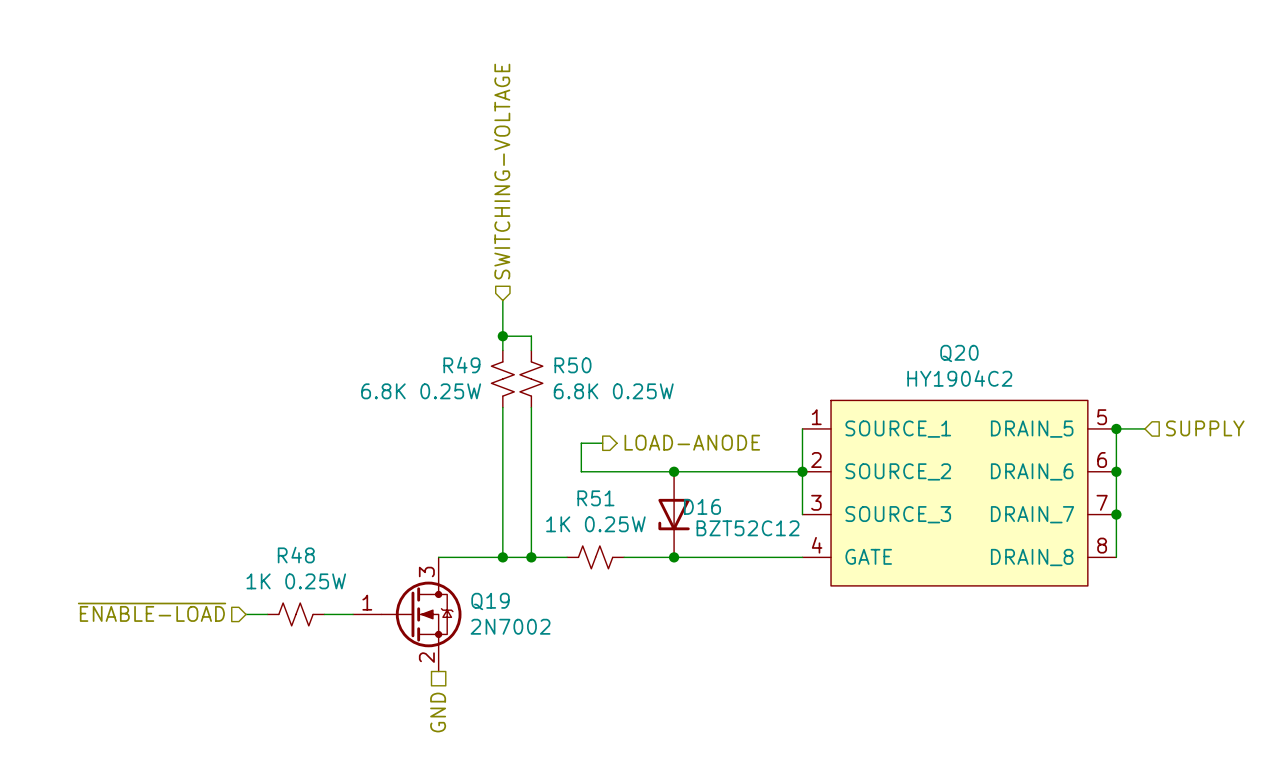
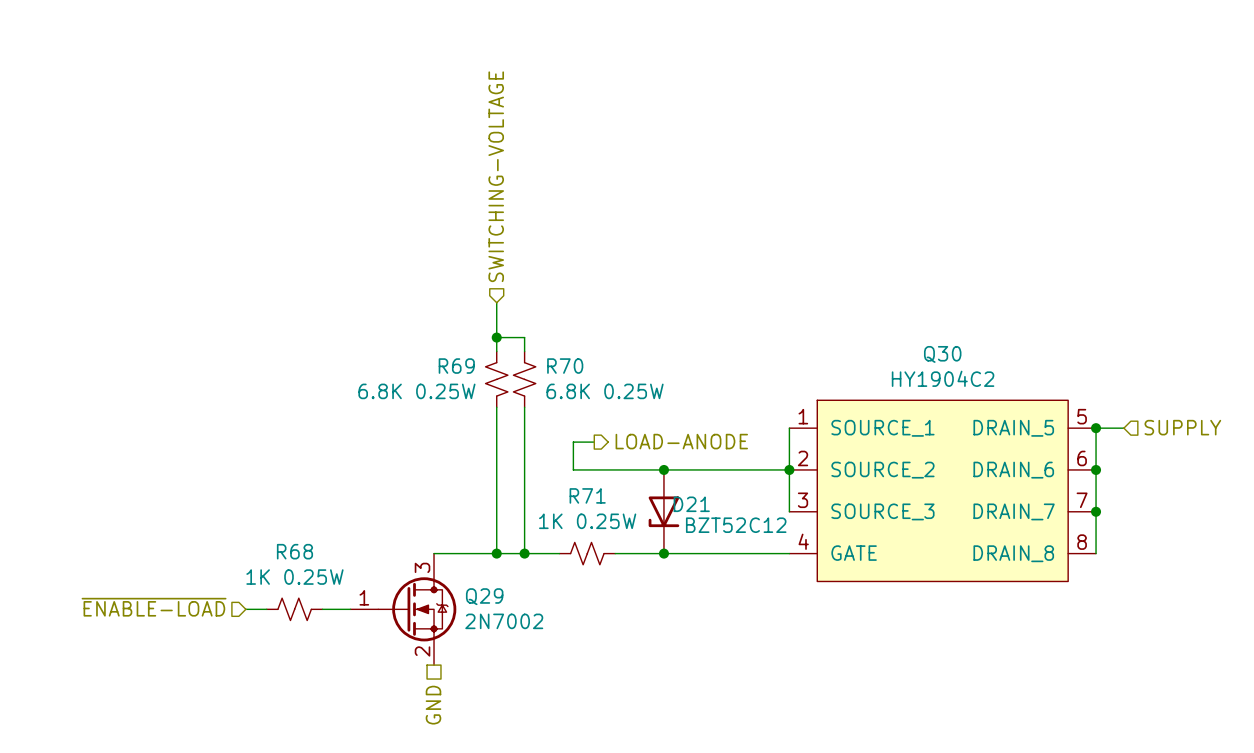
Q20 name: Q20 (959, 353) -> Q30 (942, 354)
R49 name: R49 (461, 365) -> R69 (456, 366)
R50 name: R50 (572, 365) -> R70 (565, 366)
R51 name: R51 (595, 498) -> R71 (587, 495)
D16 name: D16 (702, 506) -> D21 (691, 504)
R48 name: R48 (296, 555) -> R68 (294, 551)
Q19 name: Q19 (490, 601) -> Q29 (484, 596)

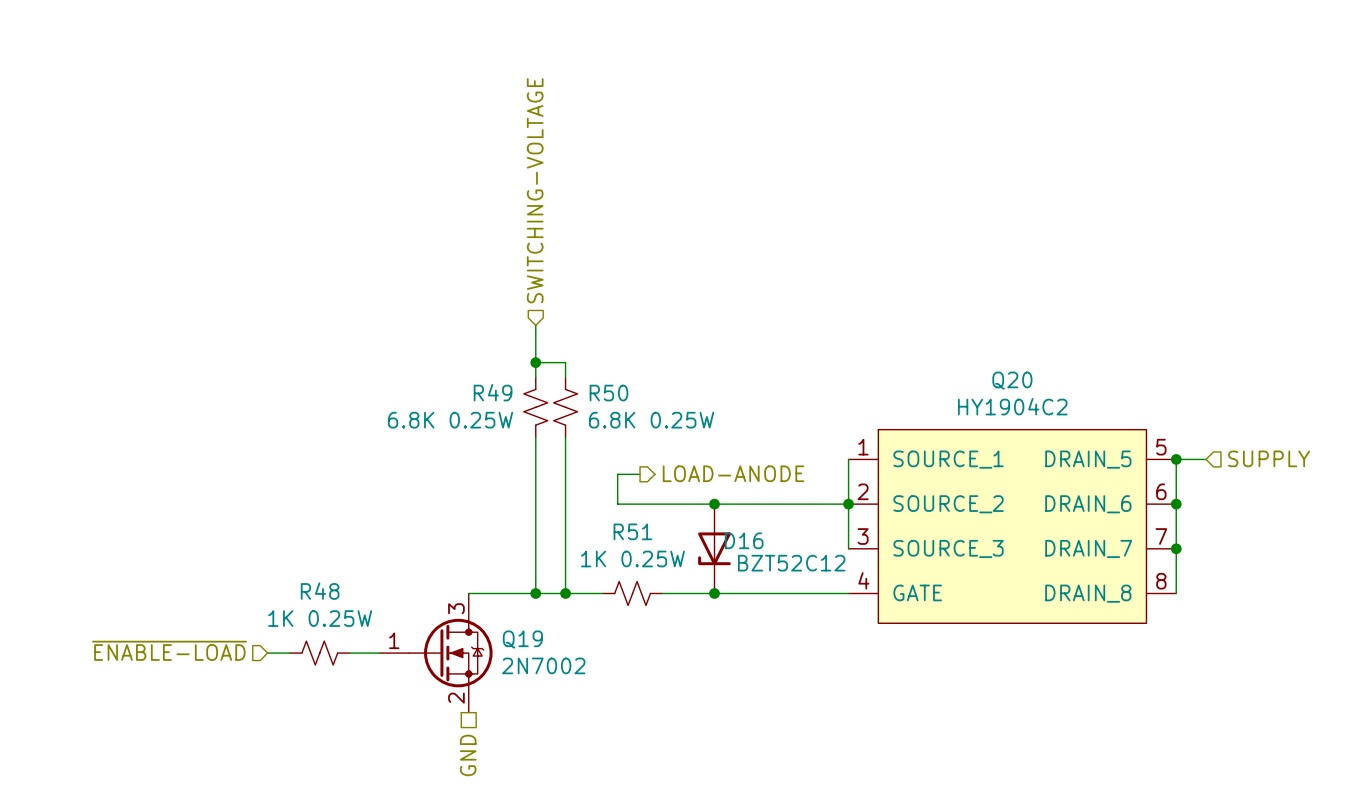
Q30 name: Q30 (942, 354) -> Q20 (1012, 380)
R69 name: R69 (456, 366) -> R49 (493, 392)
R70 name: R70 (565, 366) -> R50 (608, 393)
R71 name: R71 (587, 495) -> R51 (632, 531)
D21 name: D21 (691, 504) -> D16 (744, 540)
R68 name: R68 (294, 551) -> R48 (320, 591)
Q29 name: Q29 (484, 596) -> Q19 (522, 639)

